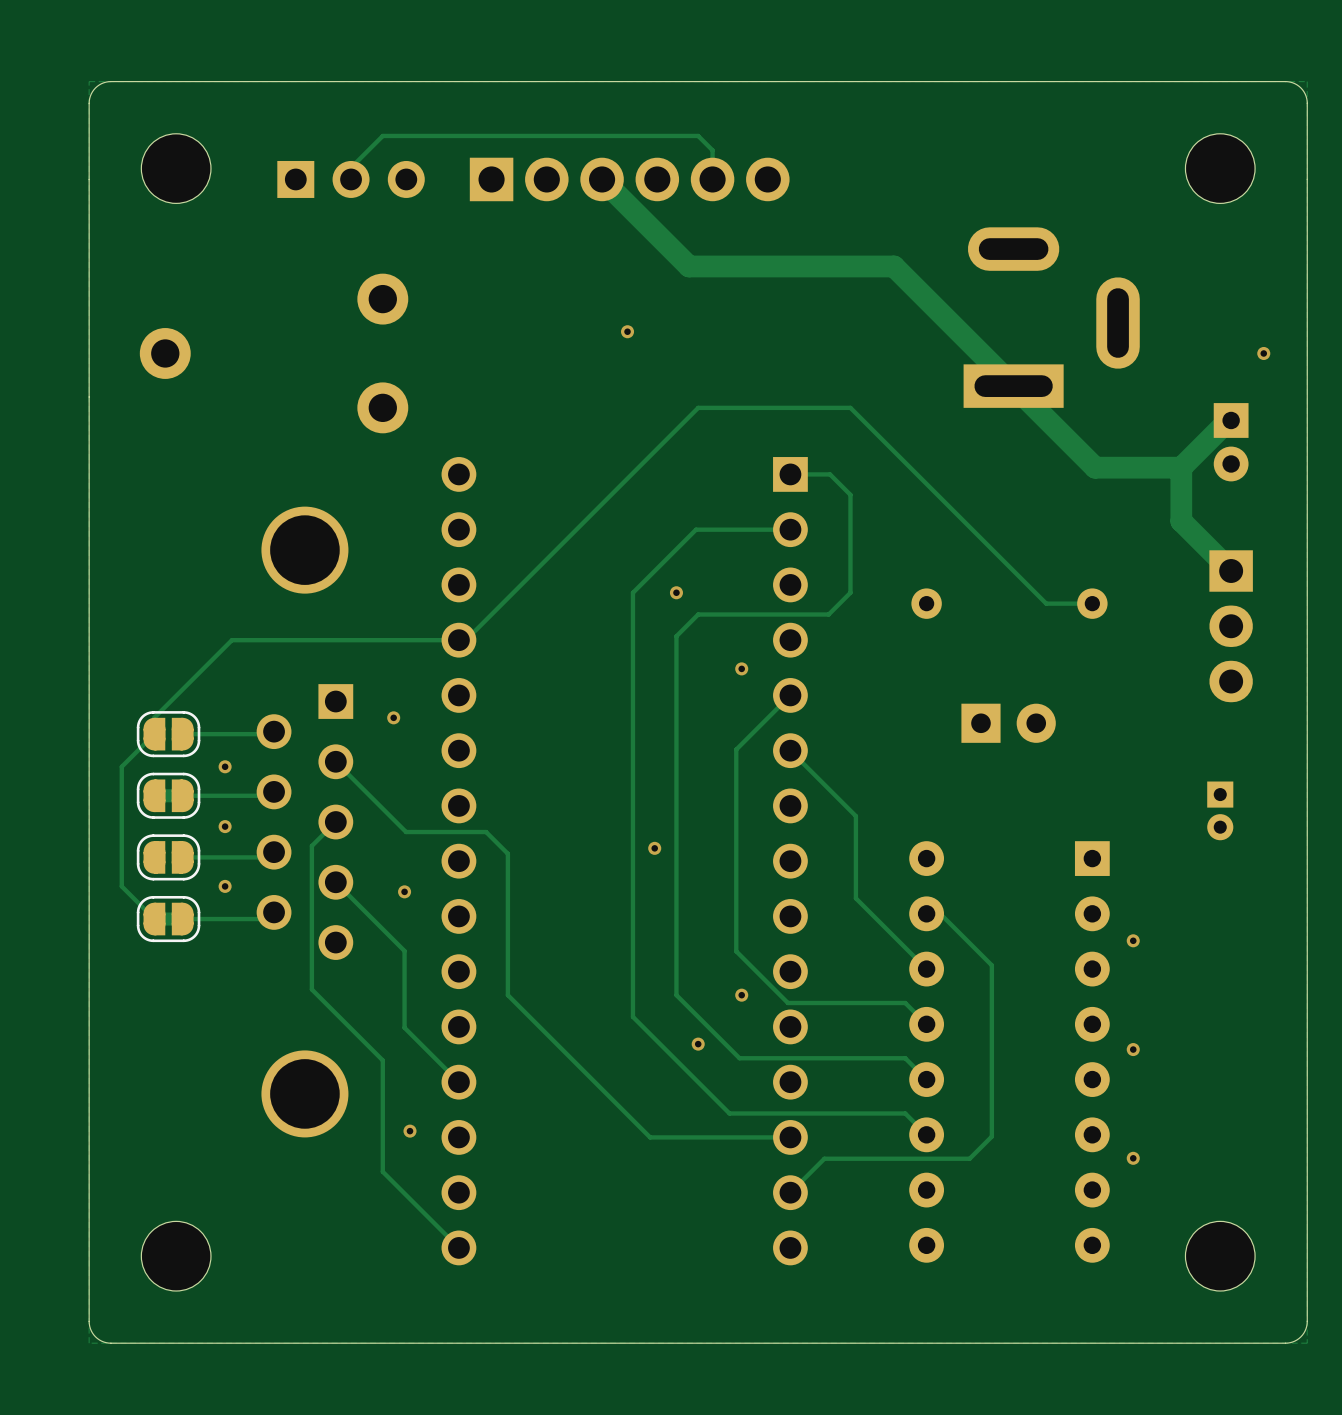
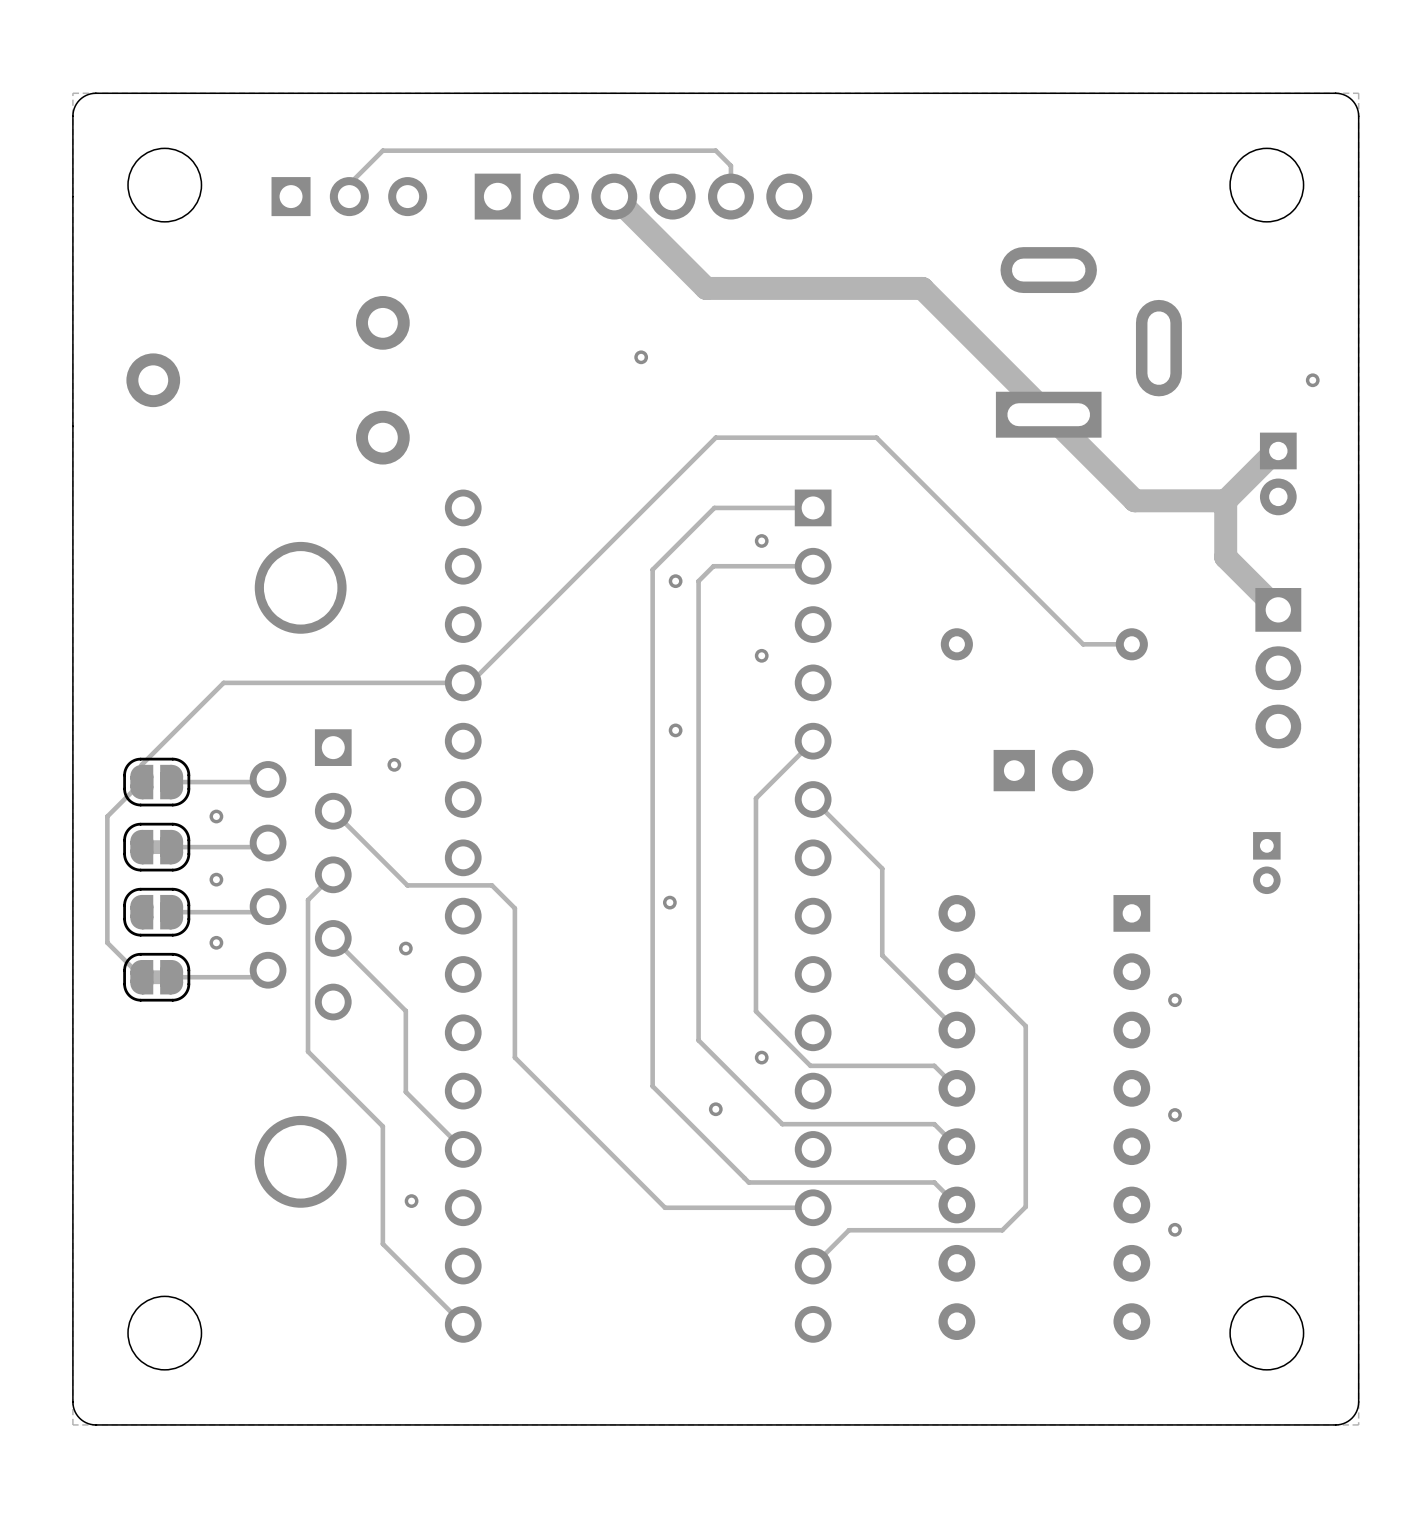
track: (790, 474) (830, 474) (850, 494) (850, 592) (828, 614) (698, 614) (676, 636) (676, 995) (739, 1058) (761, 1058) -> (813, 507) (714, 507) (652, 569) (652, 1086)
via: none -> (761, 540)
via: none -> (675, 581)
track: (681, 543) (632, 592) (632, 1016) (638, 1022) -> (698, 581) (698, 1040) (782, 1124)
via: (676, 592) -> none
via: none -> (761, 655)
via: (741, 668) -> none
via: none -> (675, 730)

